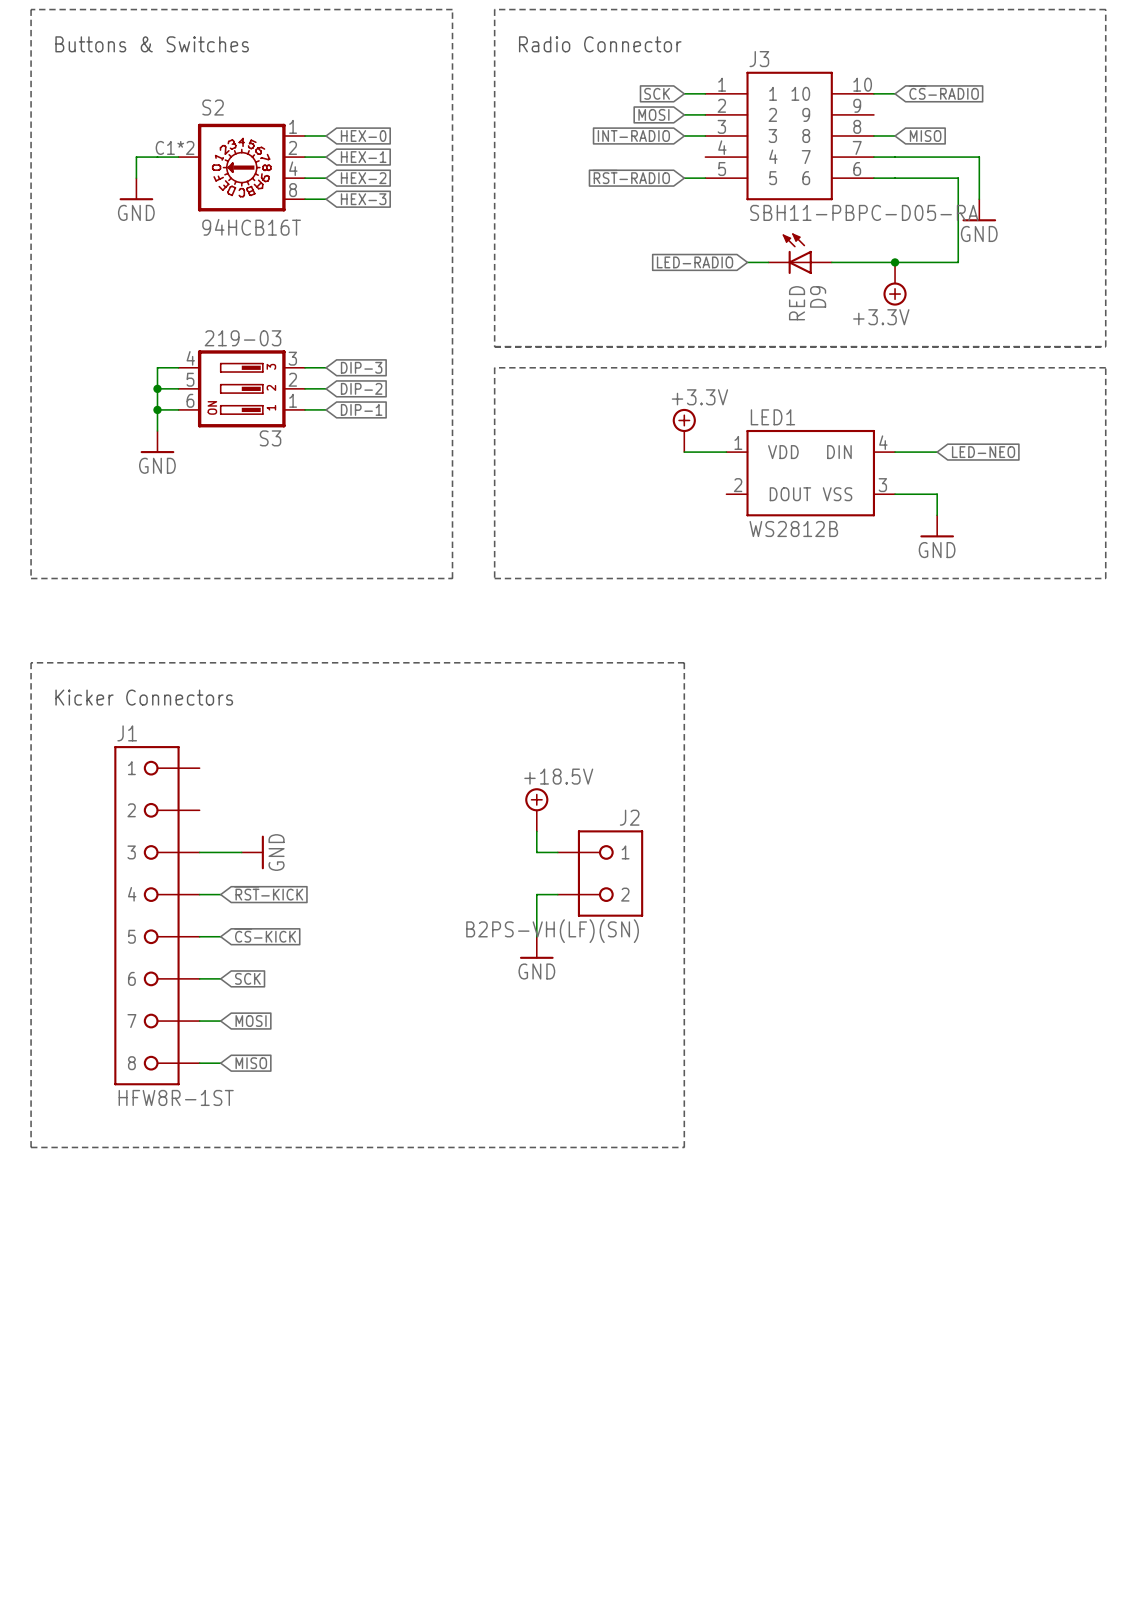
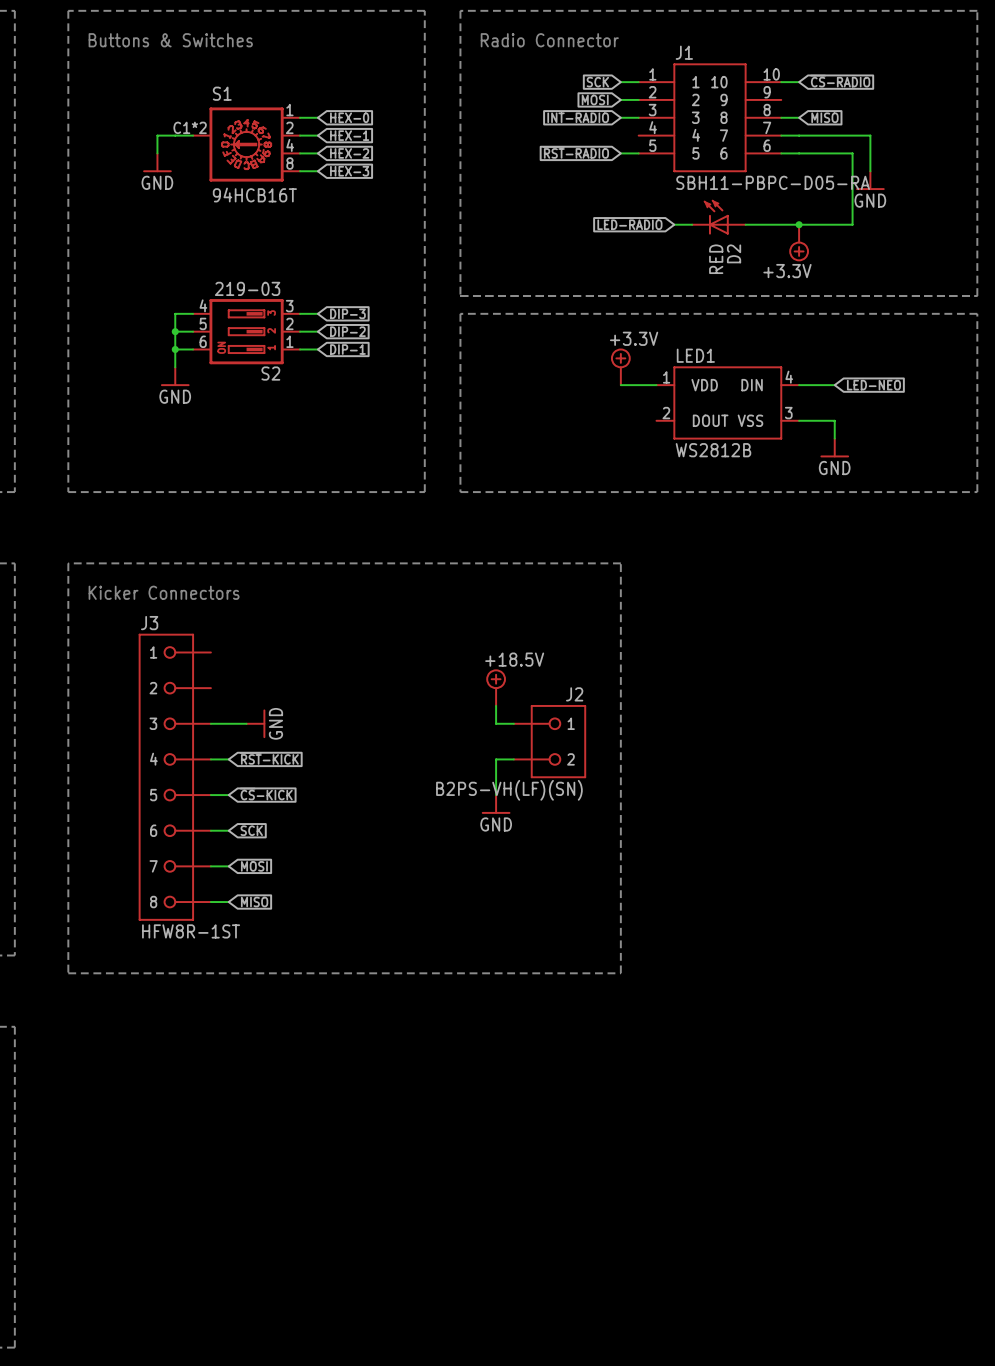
J3 name: J3 (759, 59) -> J1 (684, 52)
S2 name: S2 (213, 107) -> S1 (222, 93)
D9 name: D9 (818, 296) -> D2 (734, 253)
S3 name: S3 (270, 438) -> S2 (270, 373)
J1 name: J1 (127, 733) -> J3 (149, 623)

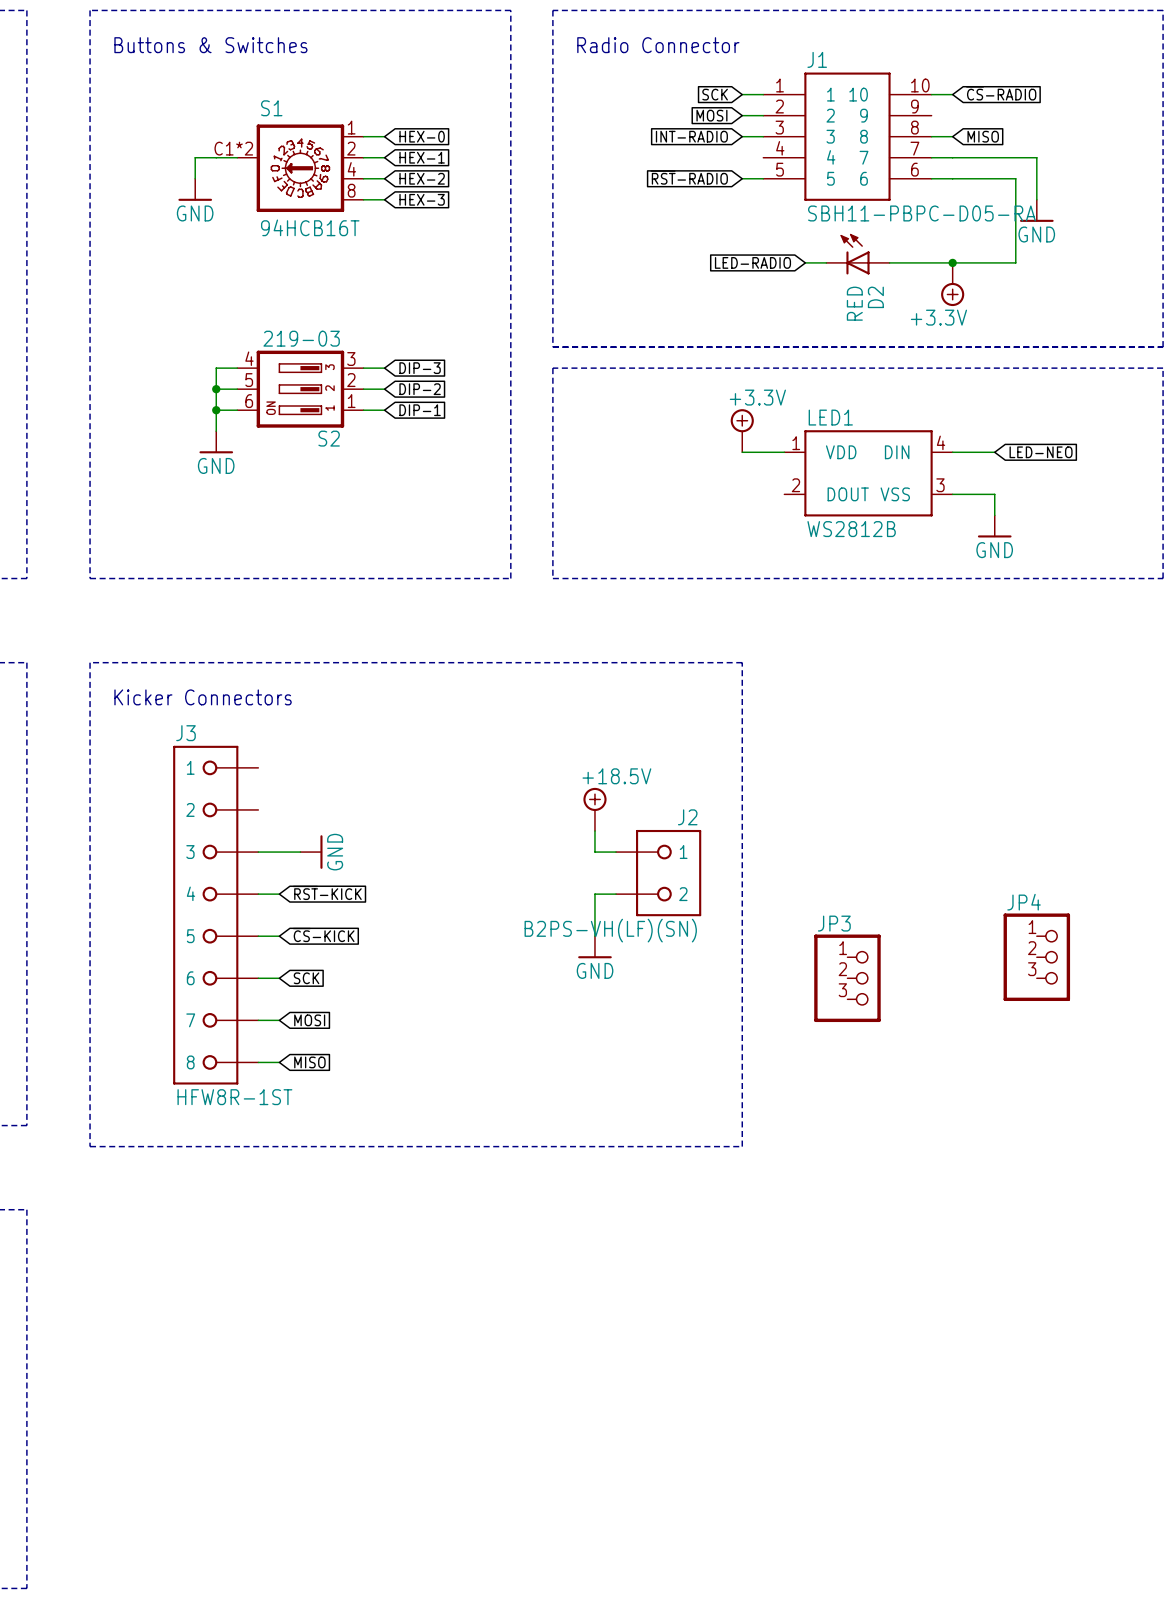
JP4: none -> (1036, 957)
JP3: none -> (847, 978)

